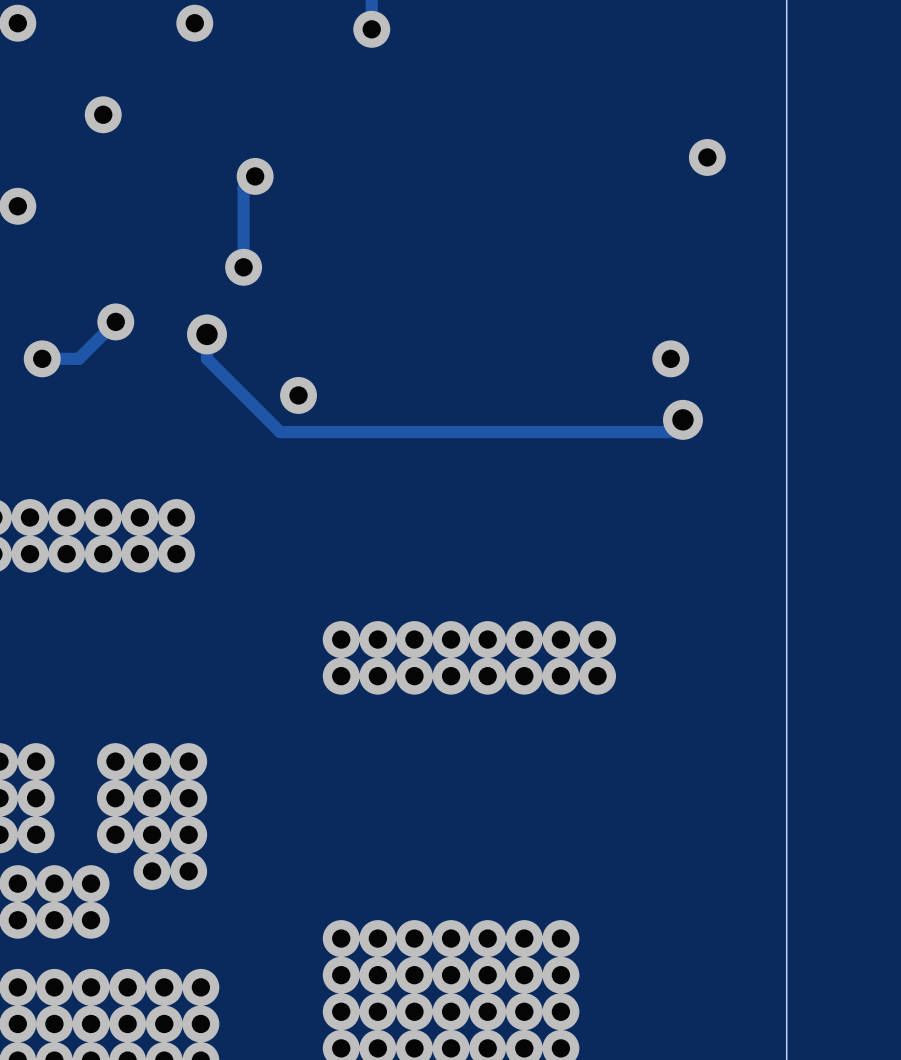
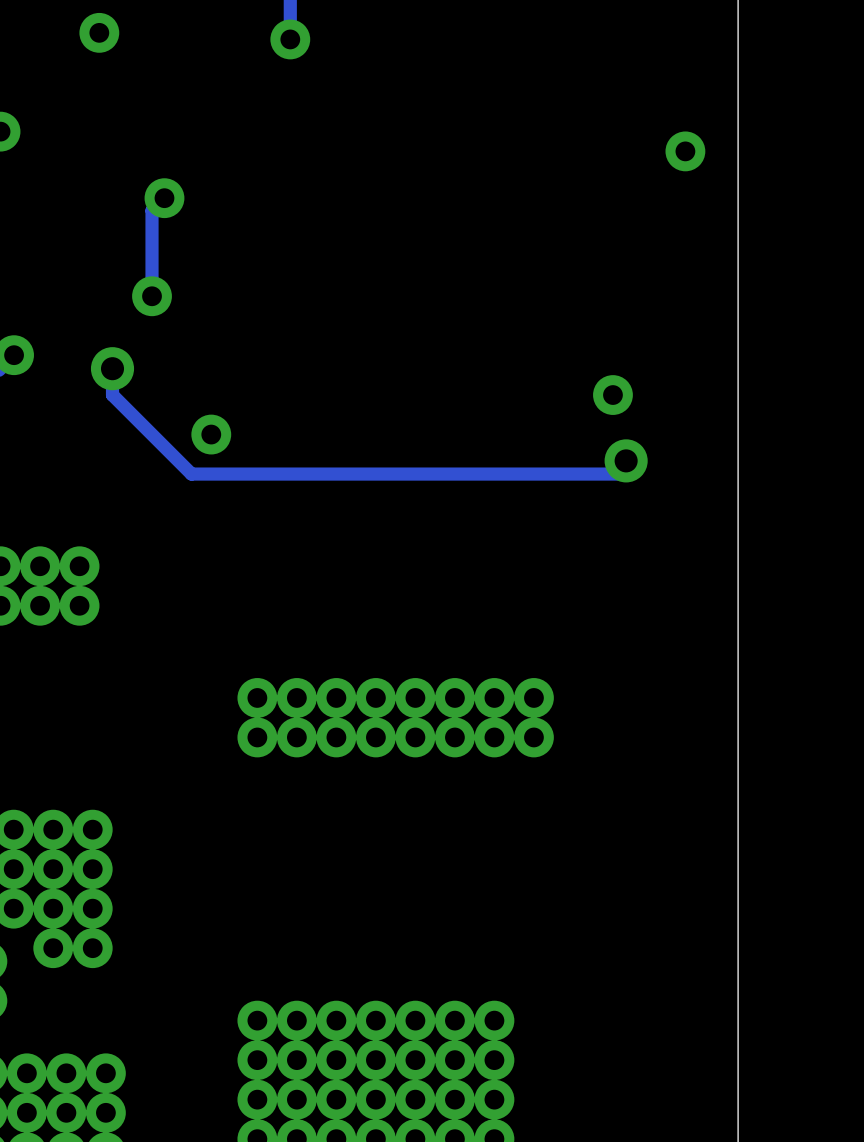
via position: (707, 157) -> (685, 151)

